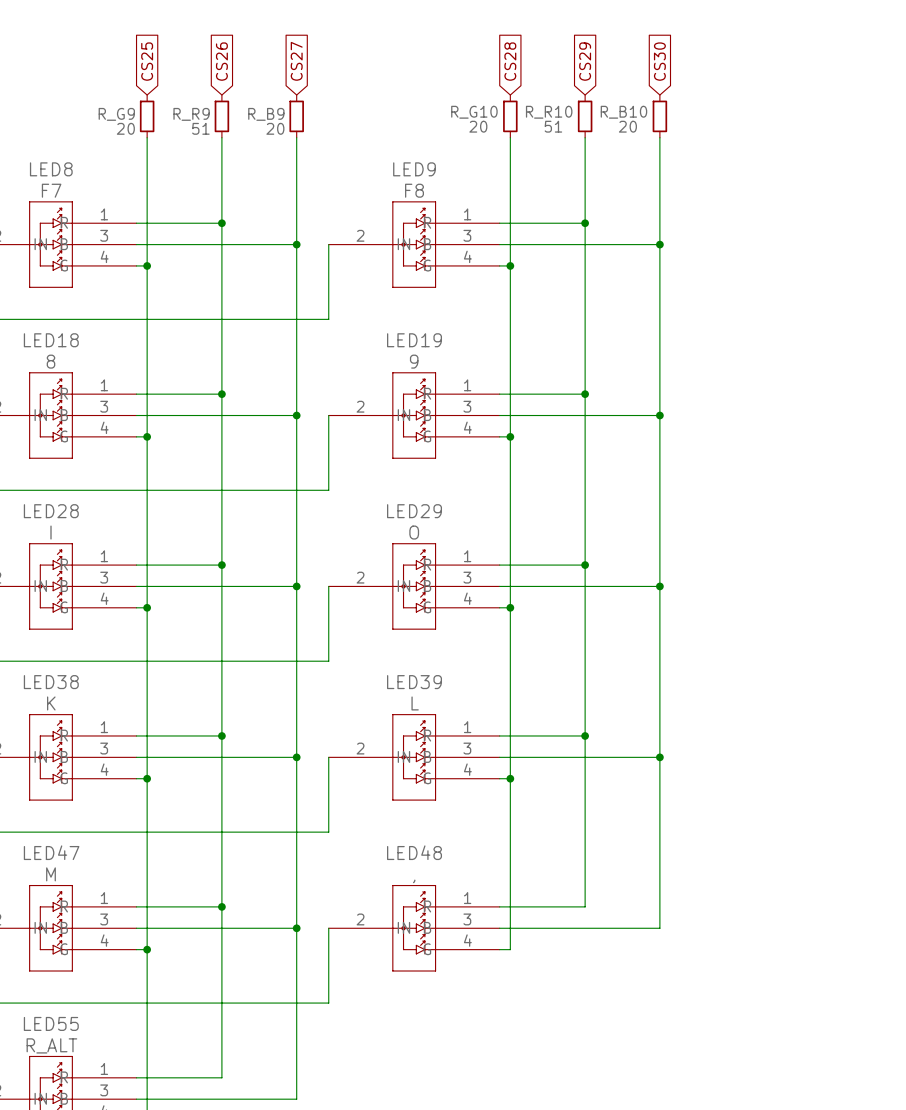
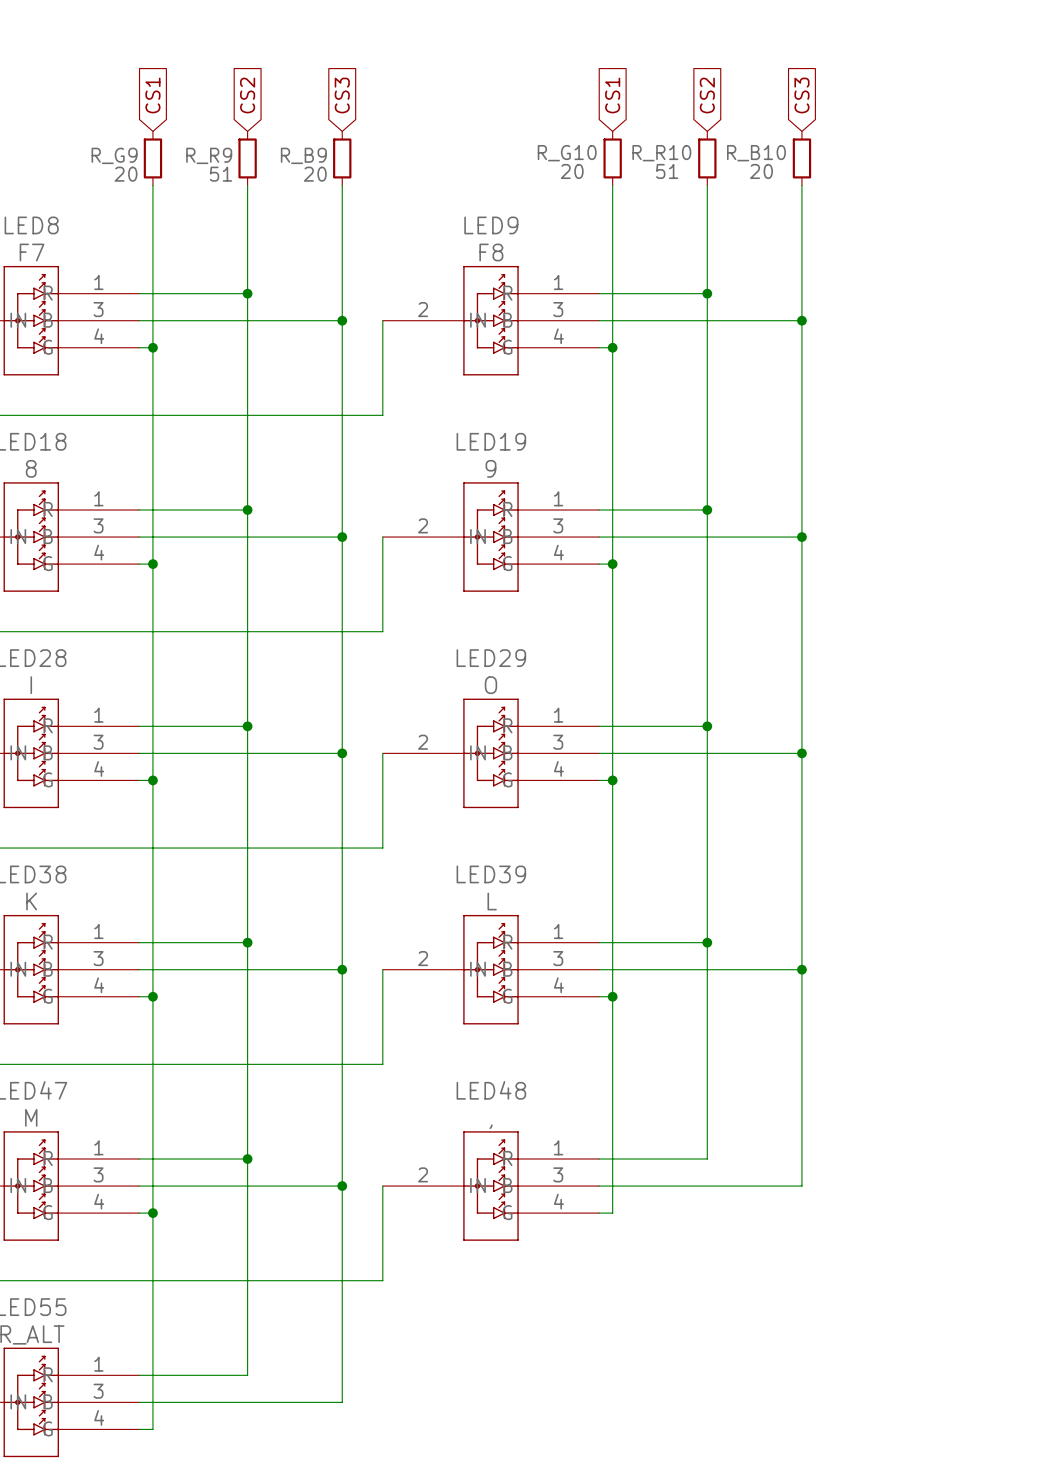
global label: CS25 (147, 61) -> CS1 (152, 95)
global label: CS26 (221, 61) -> CS2 (247, 95)
global label: CS27 (296, 61) -> CS3 (342, 95)
global label: CS28 (510, 61) -> CS1 (612, 95)
global label: CS29 (585, 61) -> CS2 (707, 95)
global label: CS30 (659, 61) -> CS3 (801, 95)

